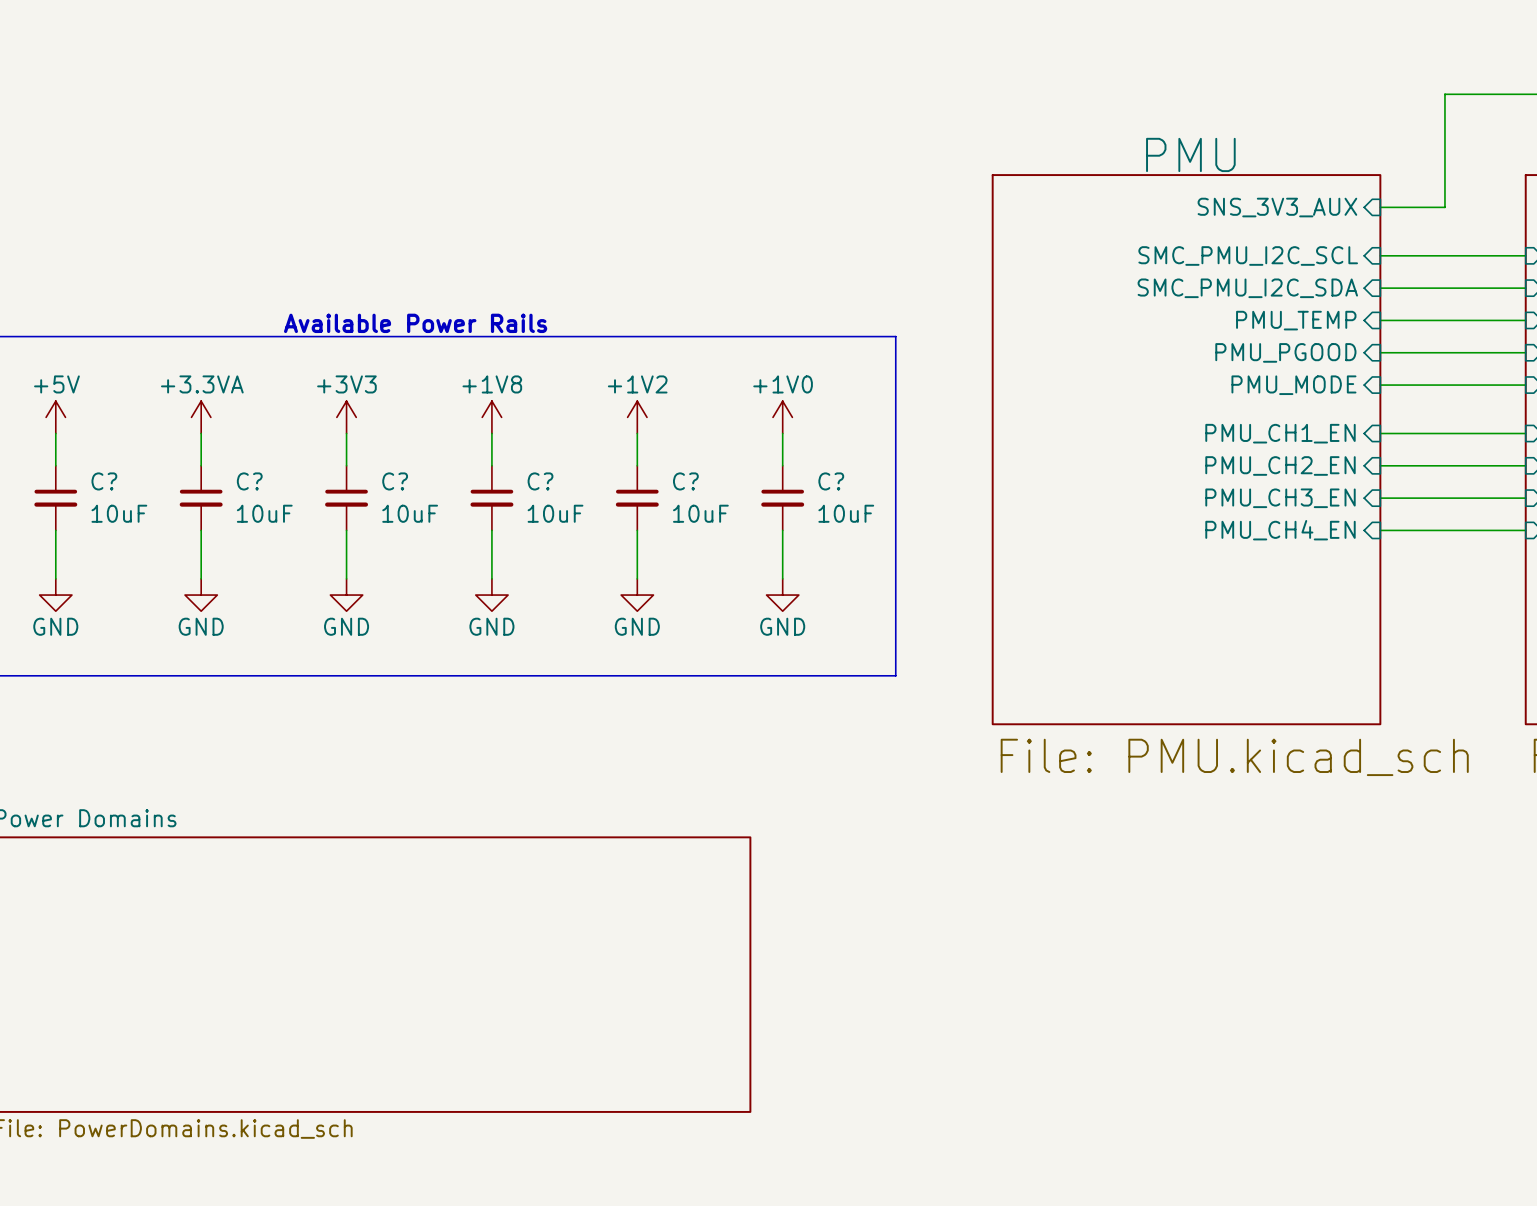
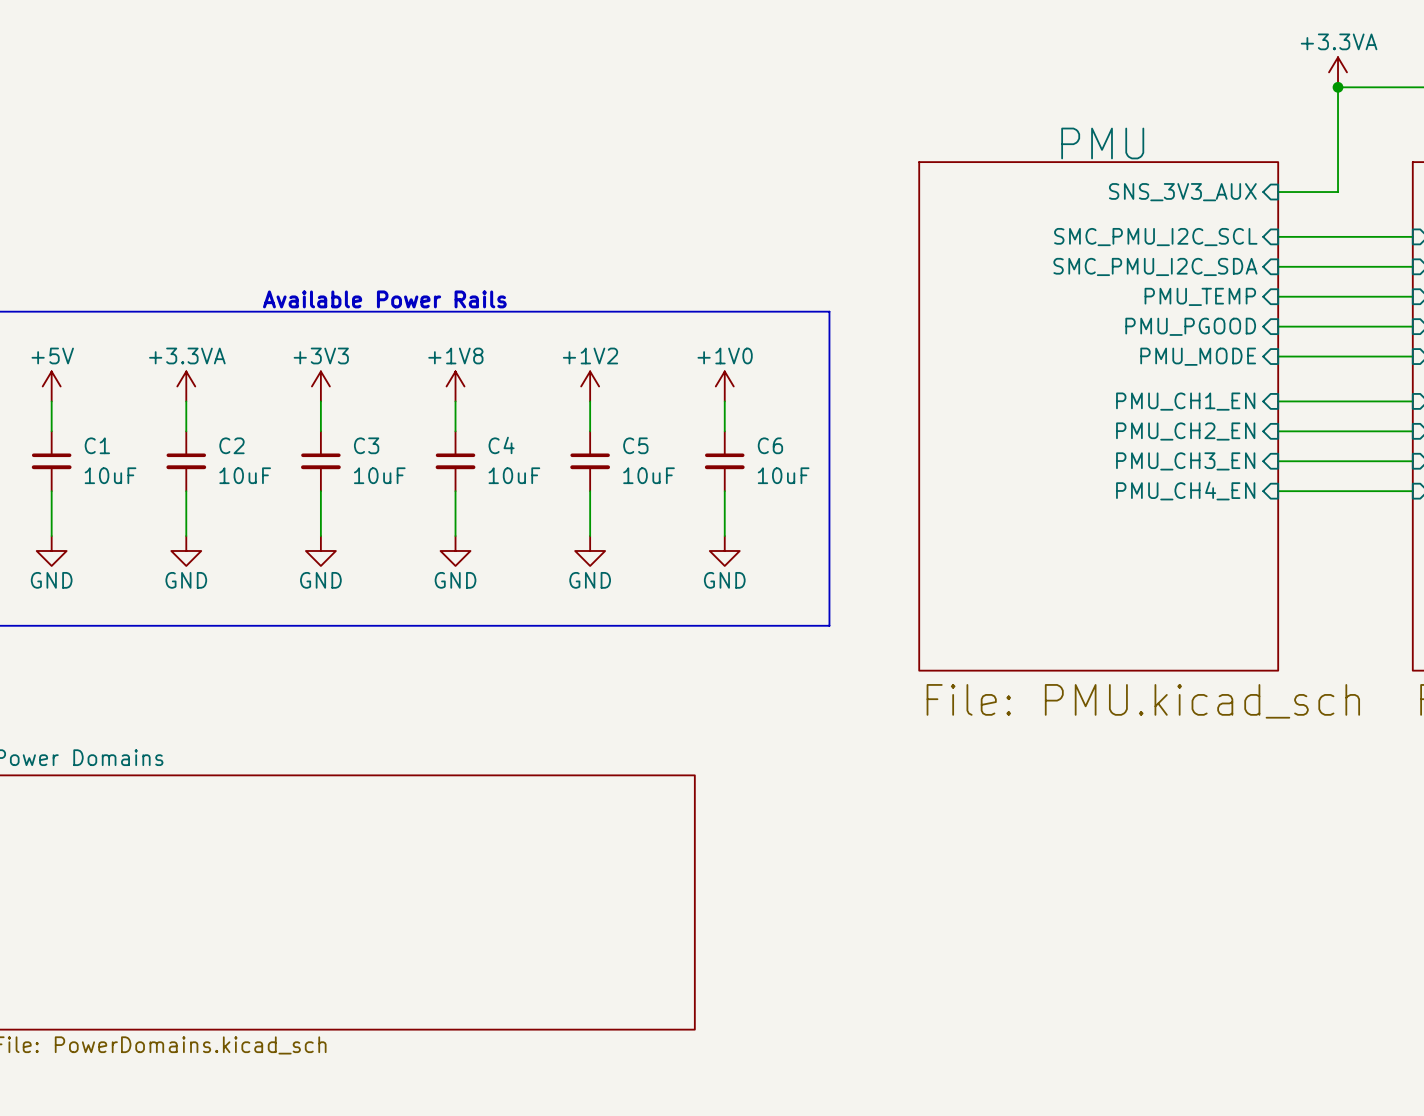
power symbol: none -> +3.3VA (1338, 72)
junction: none -> (1338, 87)
C? name: C? (104, 481) -> C1 (97, 445)
C? name: C? (249, 481) -> C2 (231, 445)
C? name: C? (395, 481) -> C3 (366, 445)
C? name: C? (540, 481) -> C4 (501, 445)
C? name: C? (685, 481) -> C5 (635, 445)
C? name: C? (831, 481) -> C6 (770, 445)

